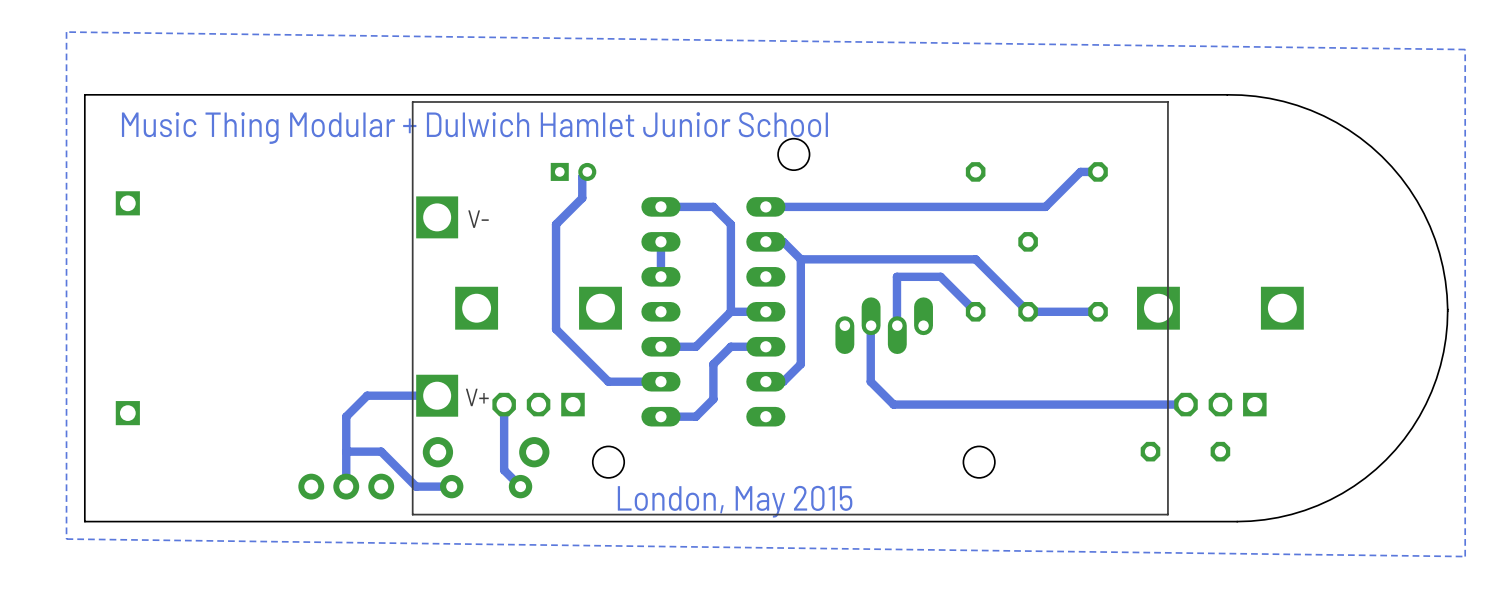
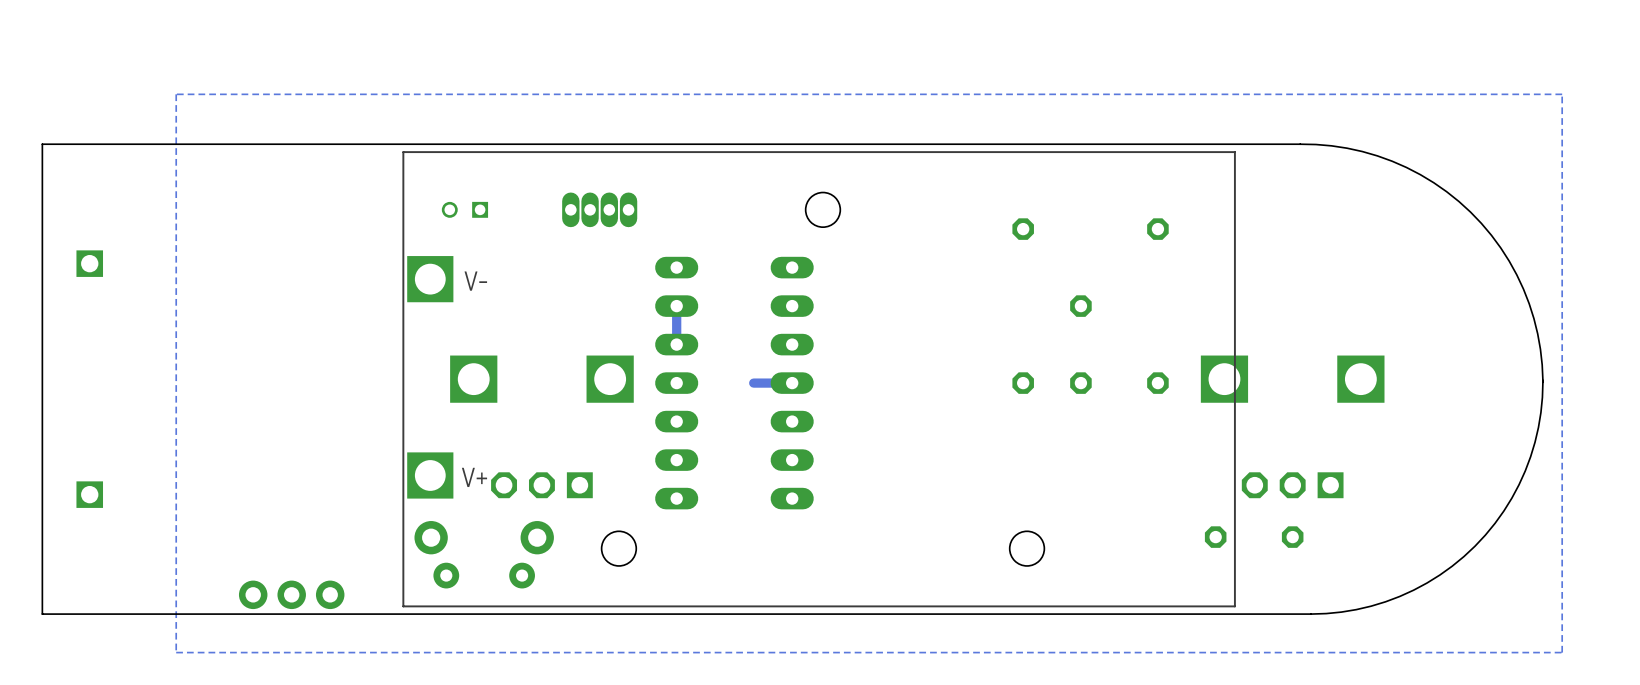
zone outline: (1465, 49) (66, 32) (66, 539) (1465, 556) -> (1562, 94) (176, 94) (176, 652) (1562, 652)
text: Music Thing Modular + Dulwich Hamlet Junior School (474, 128) -> none
part: none -> (464, 209)
part: none -> (599, 209)
part: (573, 171) -> none
track: (587, 171) (582, 176) (582, 198) (556, 224) (556, 329) (608, 381) (660, 381) -> none
track: (1098, 171) (1080, 171) (1045, 206) (765, 206) -> none
track: (660, 206) (713, 206) (730, 224) (730, 311) (695, 346) (660, 346) -> none
track: (765, 241) (783, 241) (800, 259) -> none
track: (800, 259) (800, 364) (783, 381) (765, 381) -> none
track: (800, 259) (975, 259) (1028, 311) (1098, 311) -> none
track: (975, 311) (940, 276) (896, 276) (897, 325) -> none
track: (871, 325) (870, 381) (893, 404) (1185, 404) -> none
part: (884, 325) -> none
track: (765, 346) (730, 346) (713, 364) (713, 399) (695, 416) (660, 416) -> none
track: (437, 395) (367, 395) (346, 416) (346, 486) -> none
track: (504, 404) (504, 470) (520, 486) -> none
track: (346, 451) (381, 451) (416, 486) (451, 486) -> none
part position: (346, 486) -> (291, 594)
text: London, May 2015 (735, 501) -> none

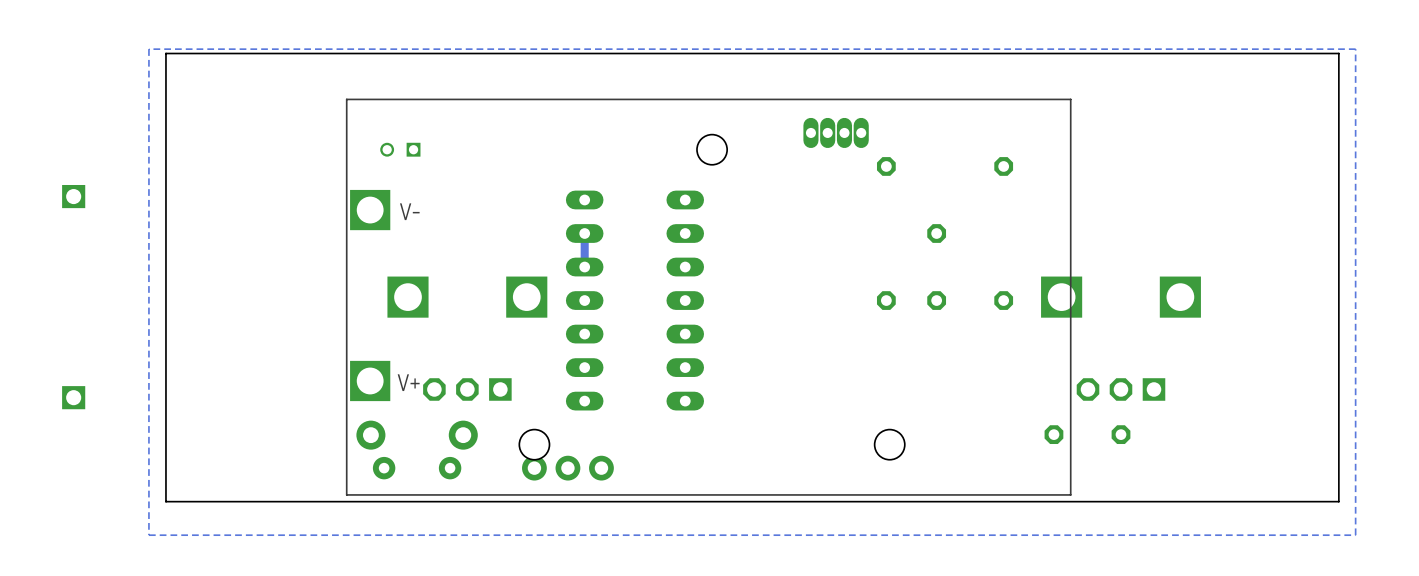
part position: (599, 209) -> (836, 132)
board edge: (1542, 380) (1537, 333) (1523, 289) (1500, 247) (1481, 223) (1446, 191) (1420, 174) (1392, 161) (1347, 148) (1300, 144) (42, 144) (42, 614) (195, 614) -> (1338, 298) (1338, 53) (165, 53) (165, 501)
board edge: (1542, 382) (1538, 427) (1525, 470) (1503, 511) (1475, 546) (1439, 575) (1399, 596) (1356, 609) (1311, 614) -> (1338, 299) (1338, 501) (1137, 501)
track: (792, 383) (753, 383) -> none
part position: (291, 594) -> (567, 468)

